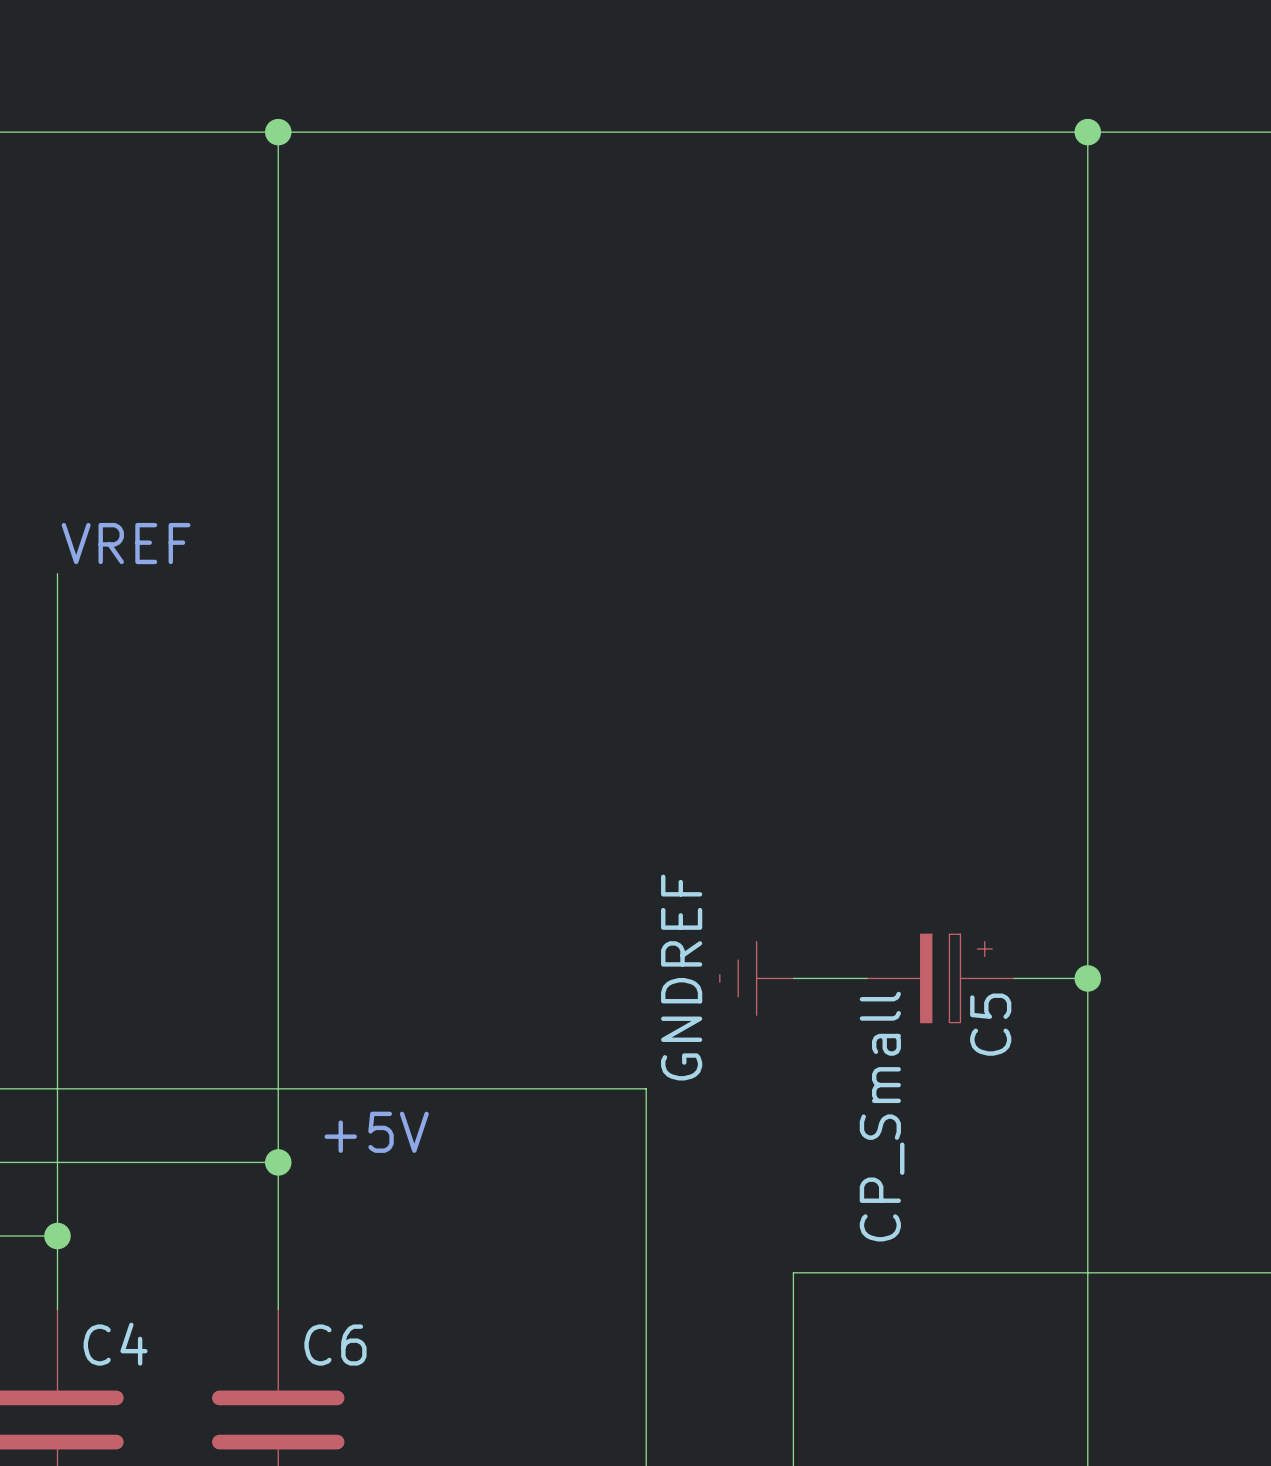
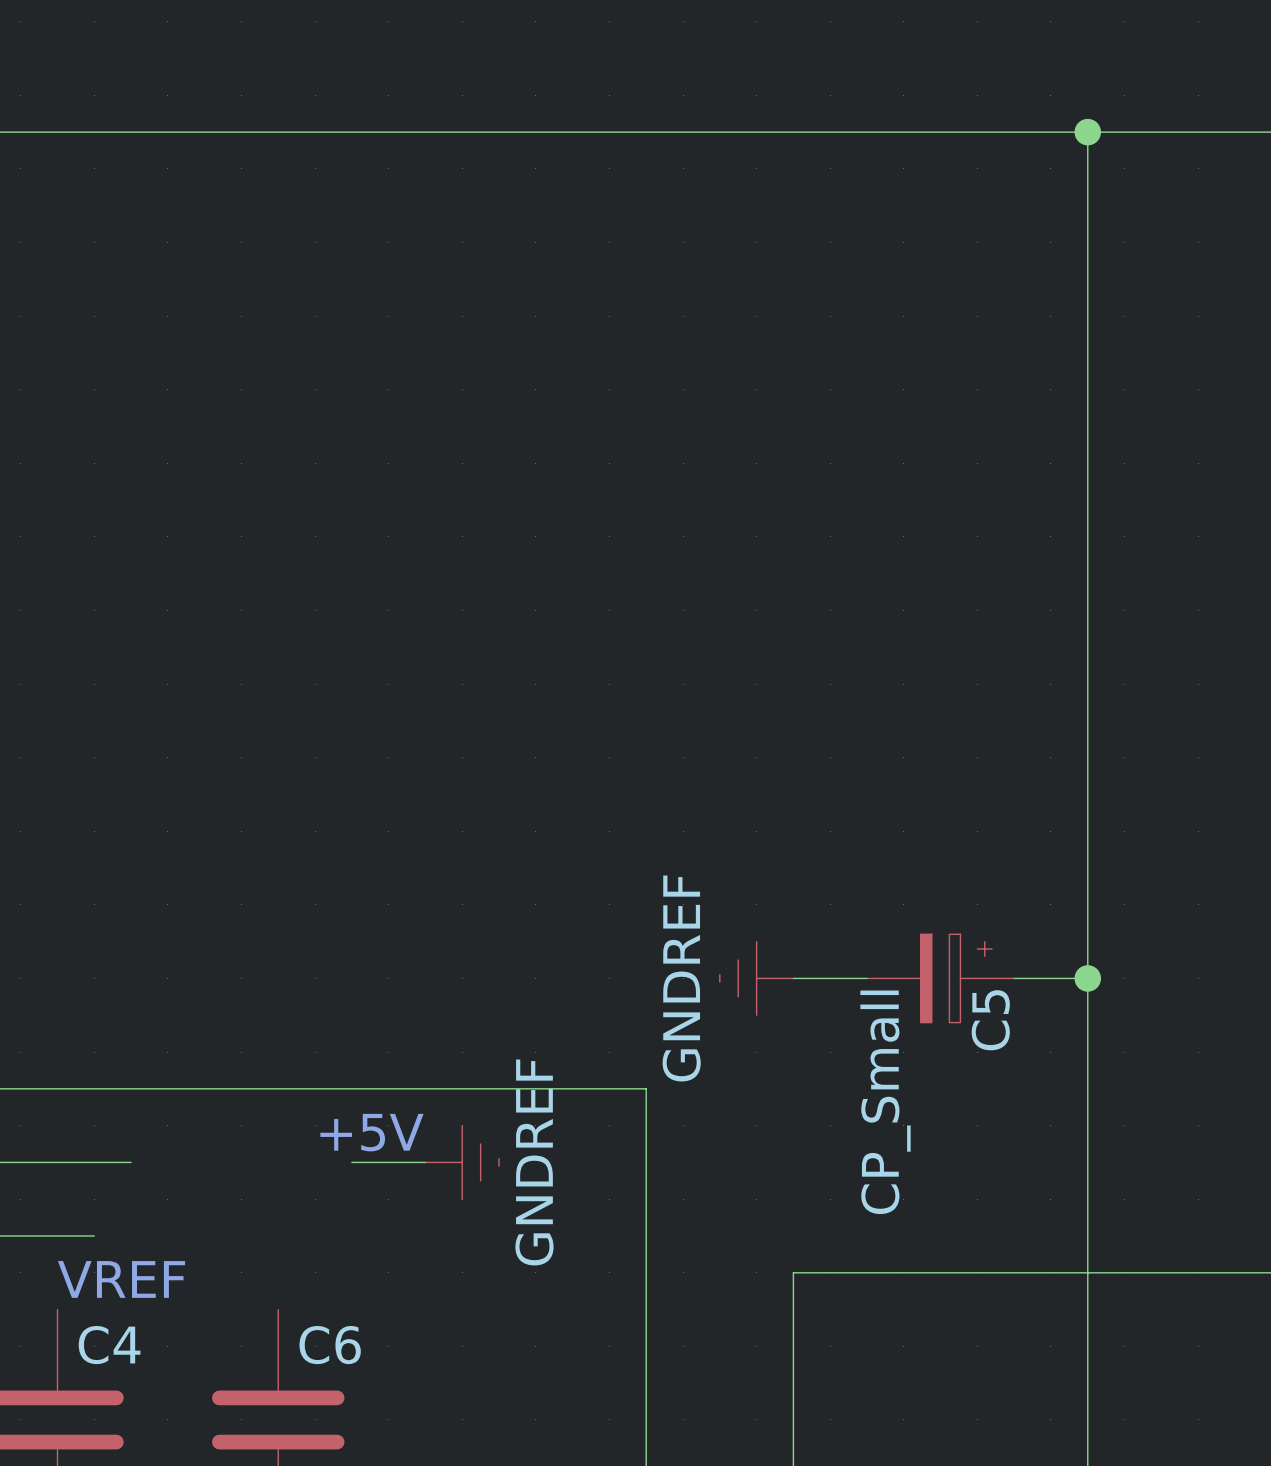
wire: (278, 132) (278, 1309) -> none
junction: (278, 132) -> none
text: VREF (126, 543) -> none
wire: (57, 573) (57, 1309) -> none
wire: (131, 1162) (278, 1162) -> none
junction: (278, 1162) -> none
wire: none -> (351, 1162) (425, 1162)
power symbol: none -> GNDREF (462, 1162)
wire: none -> (57, 1236) (94, 1236)
junction: (57, 1236) -> none
text: none -> VREF (121, 1279)

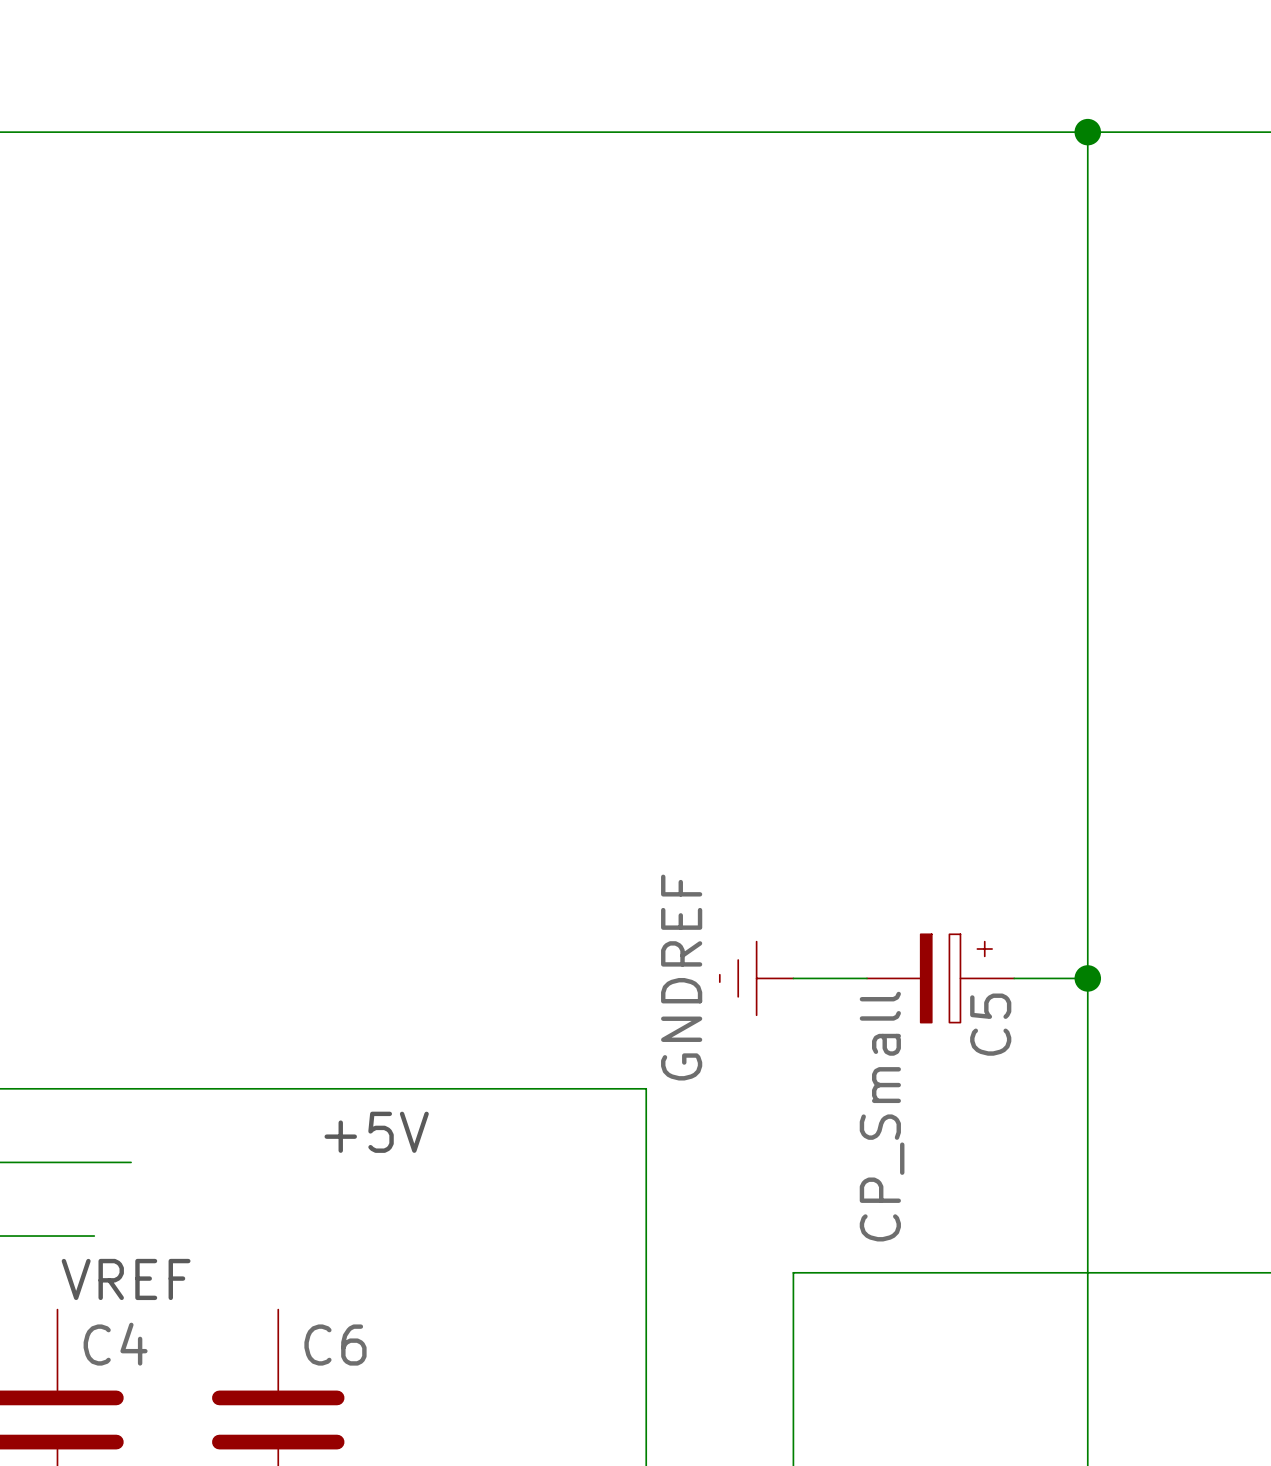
wire: (351, 1162) (425, 1162) -> none
power symbol: GNDREF (462, 1162) -> none

